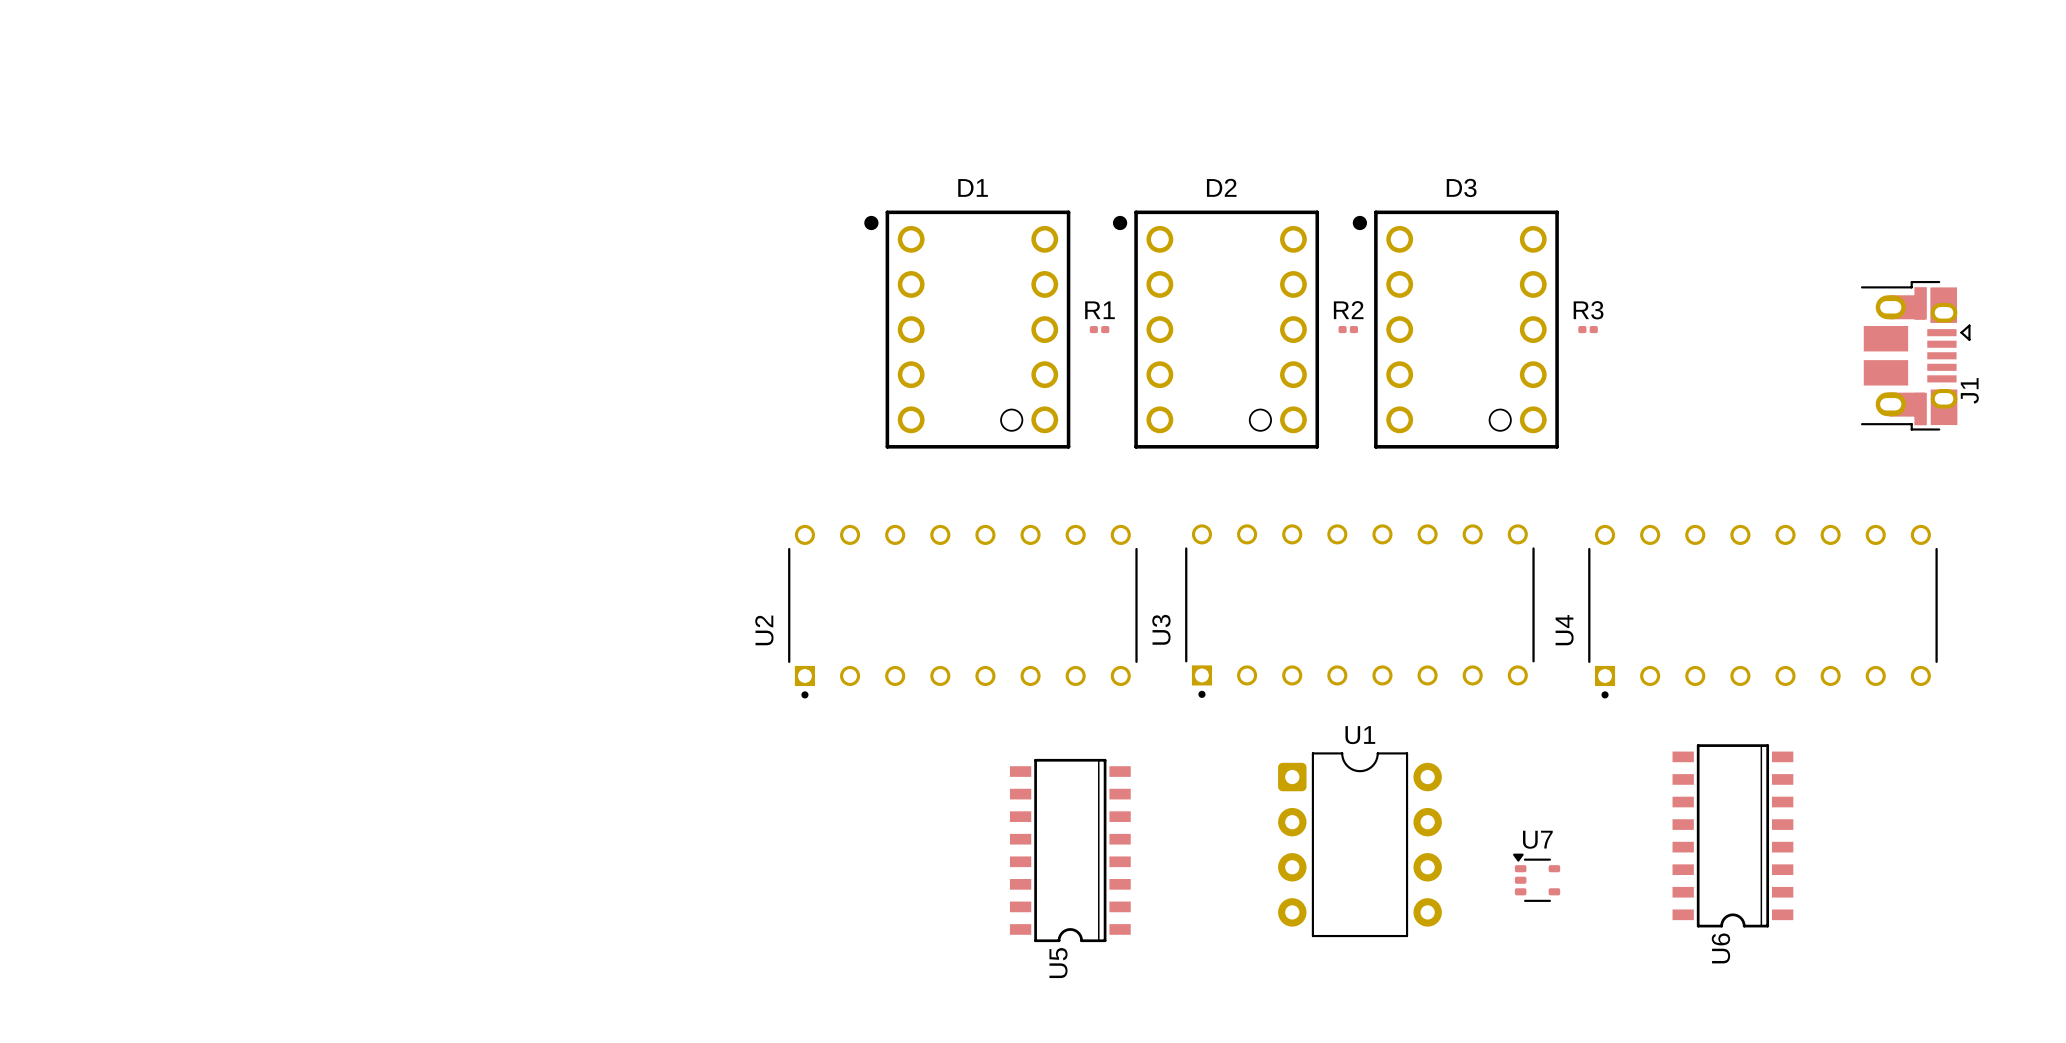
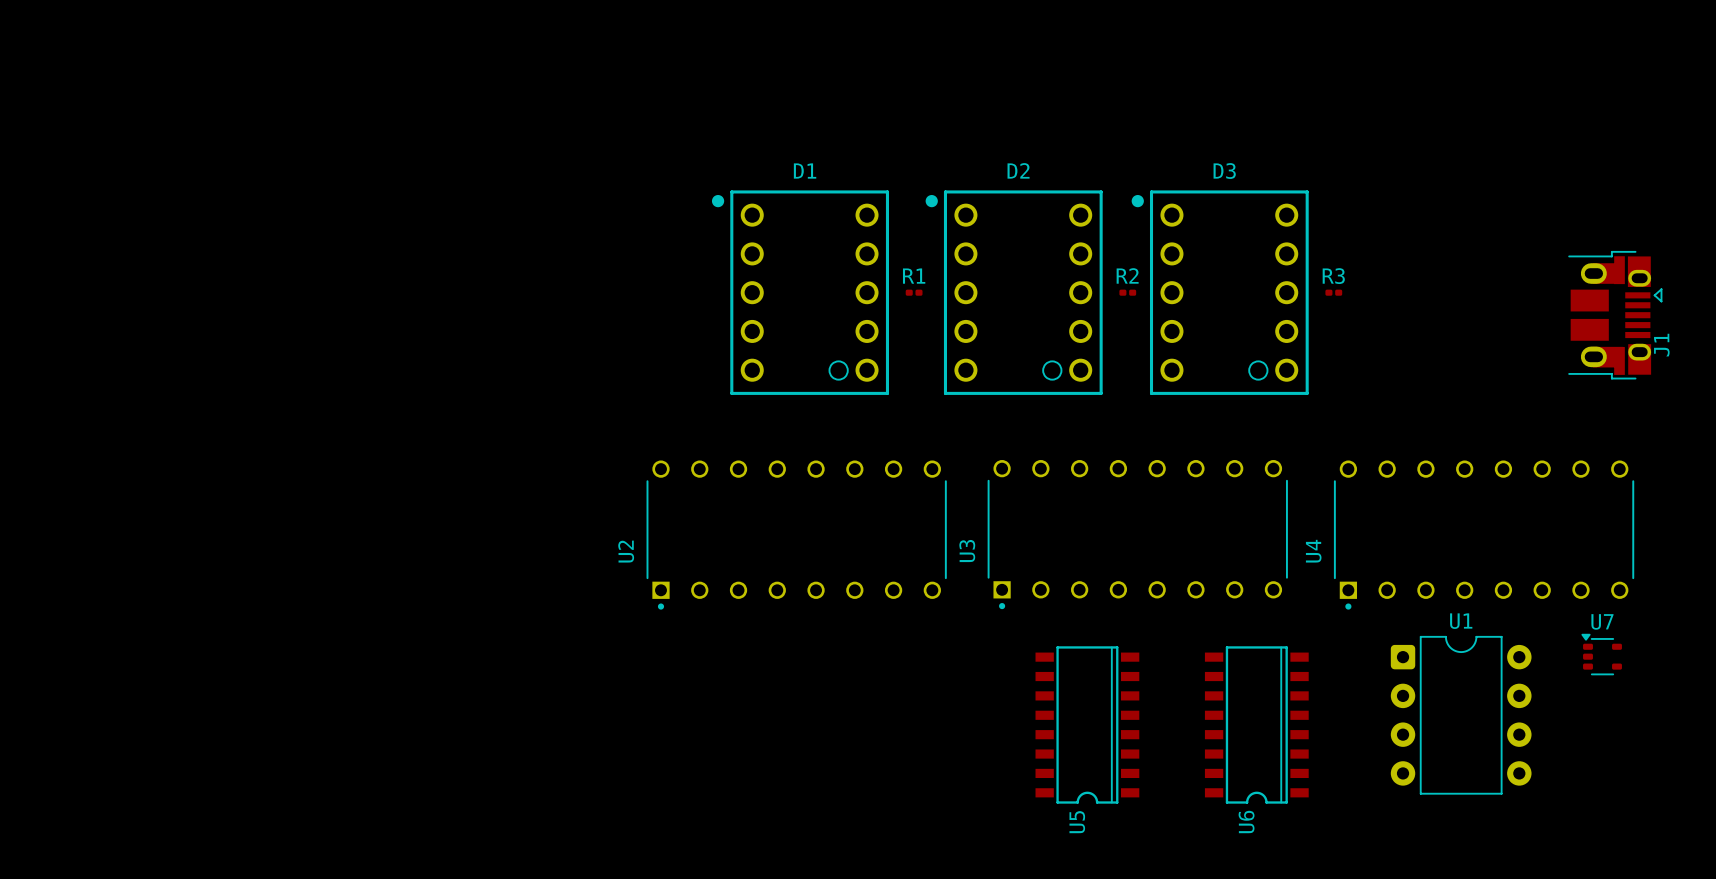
U6 position: (1732, 835) -> (1256, 724)
U1 position: (1359, 844) -> (1461, 715)
U5 position: (1070, 850) -> (1087, 724)
U7 position: (1536, 877) -> (1601, 654)

